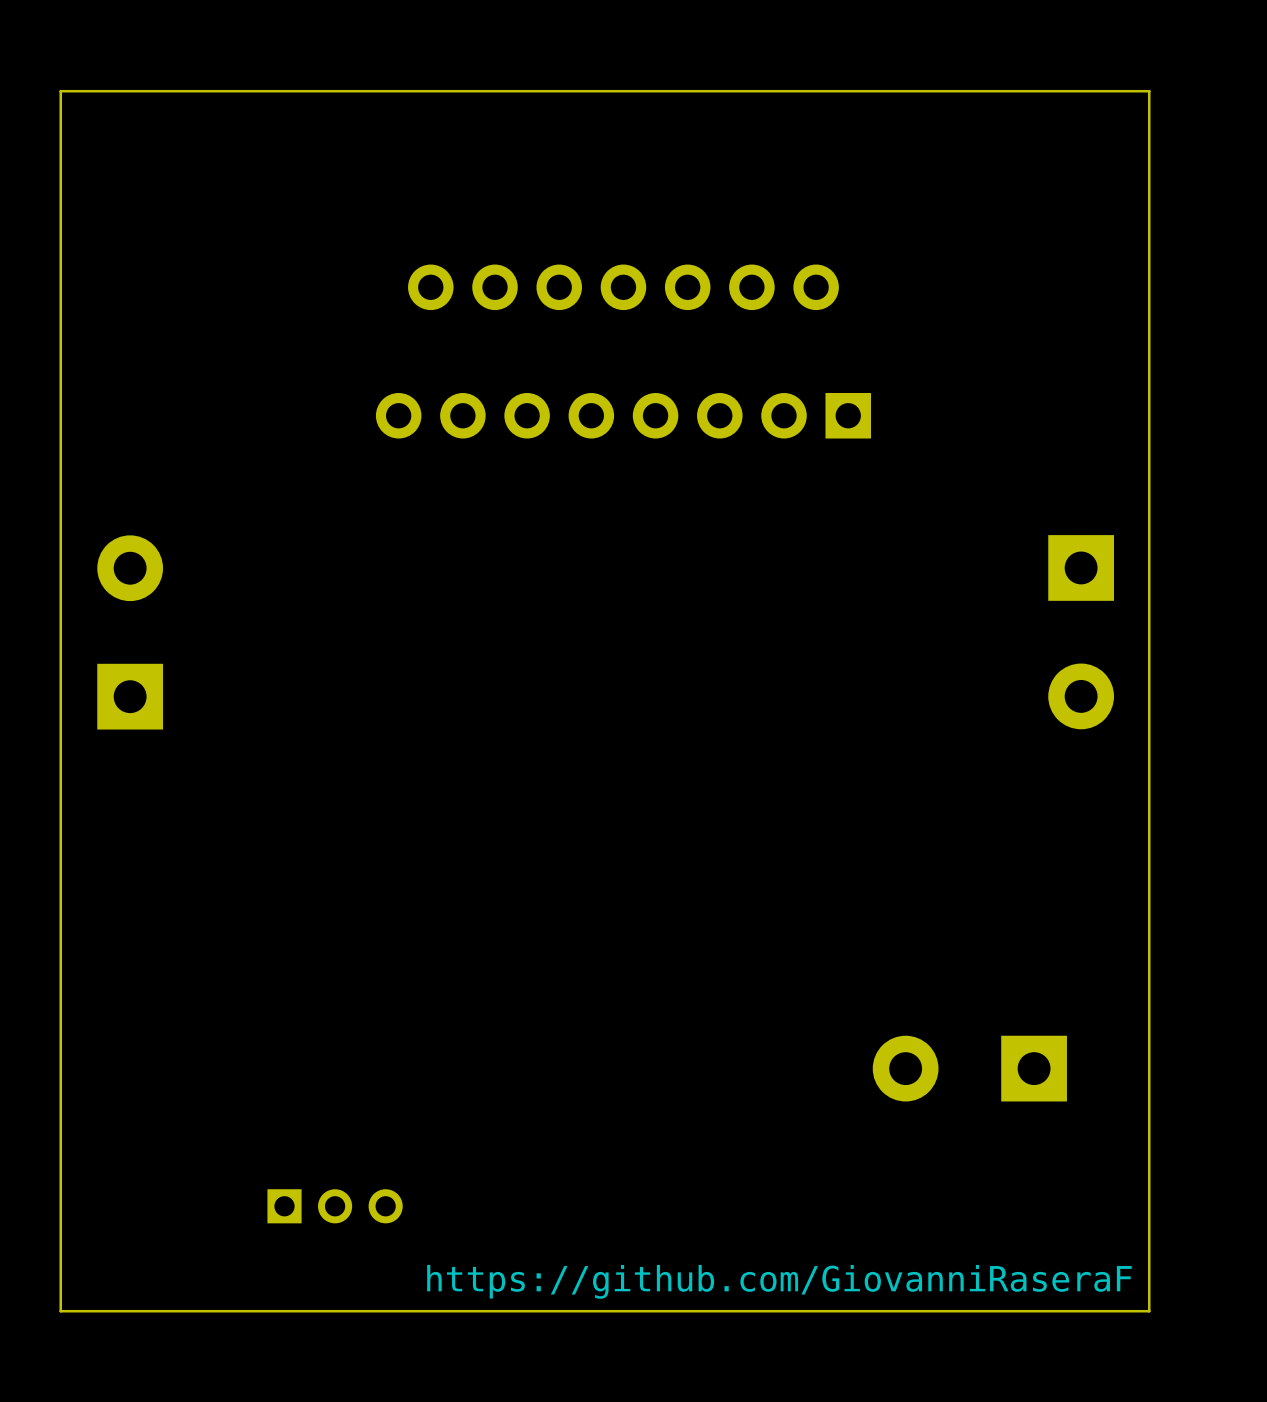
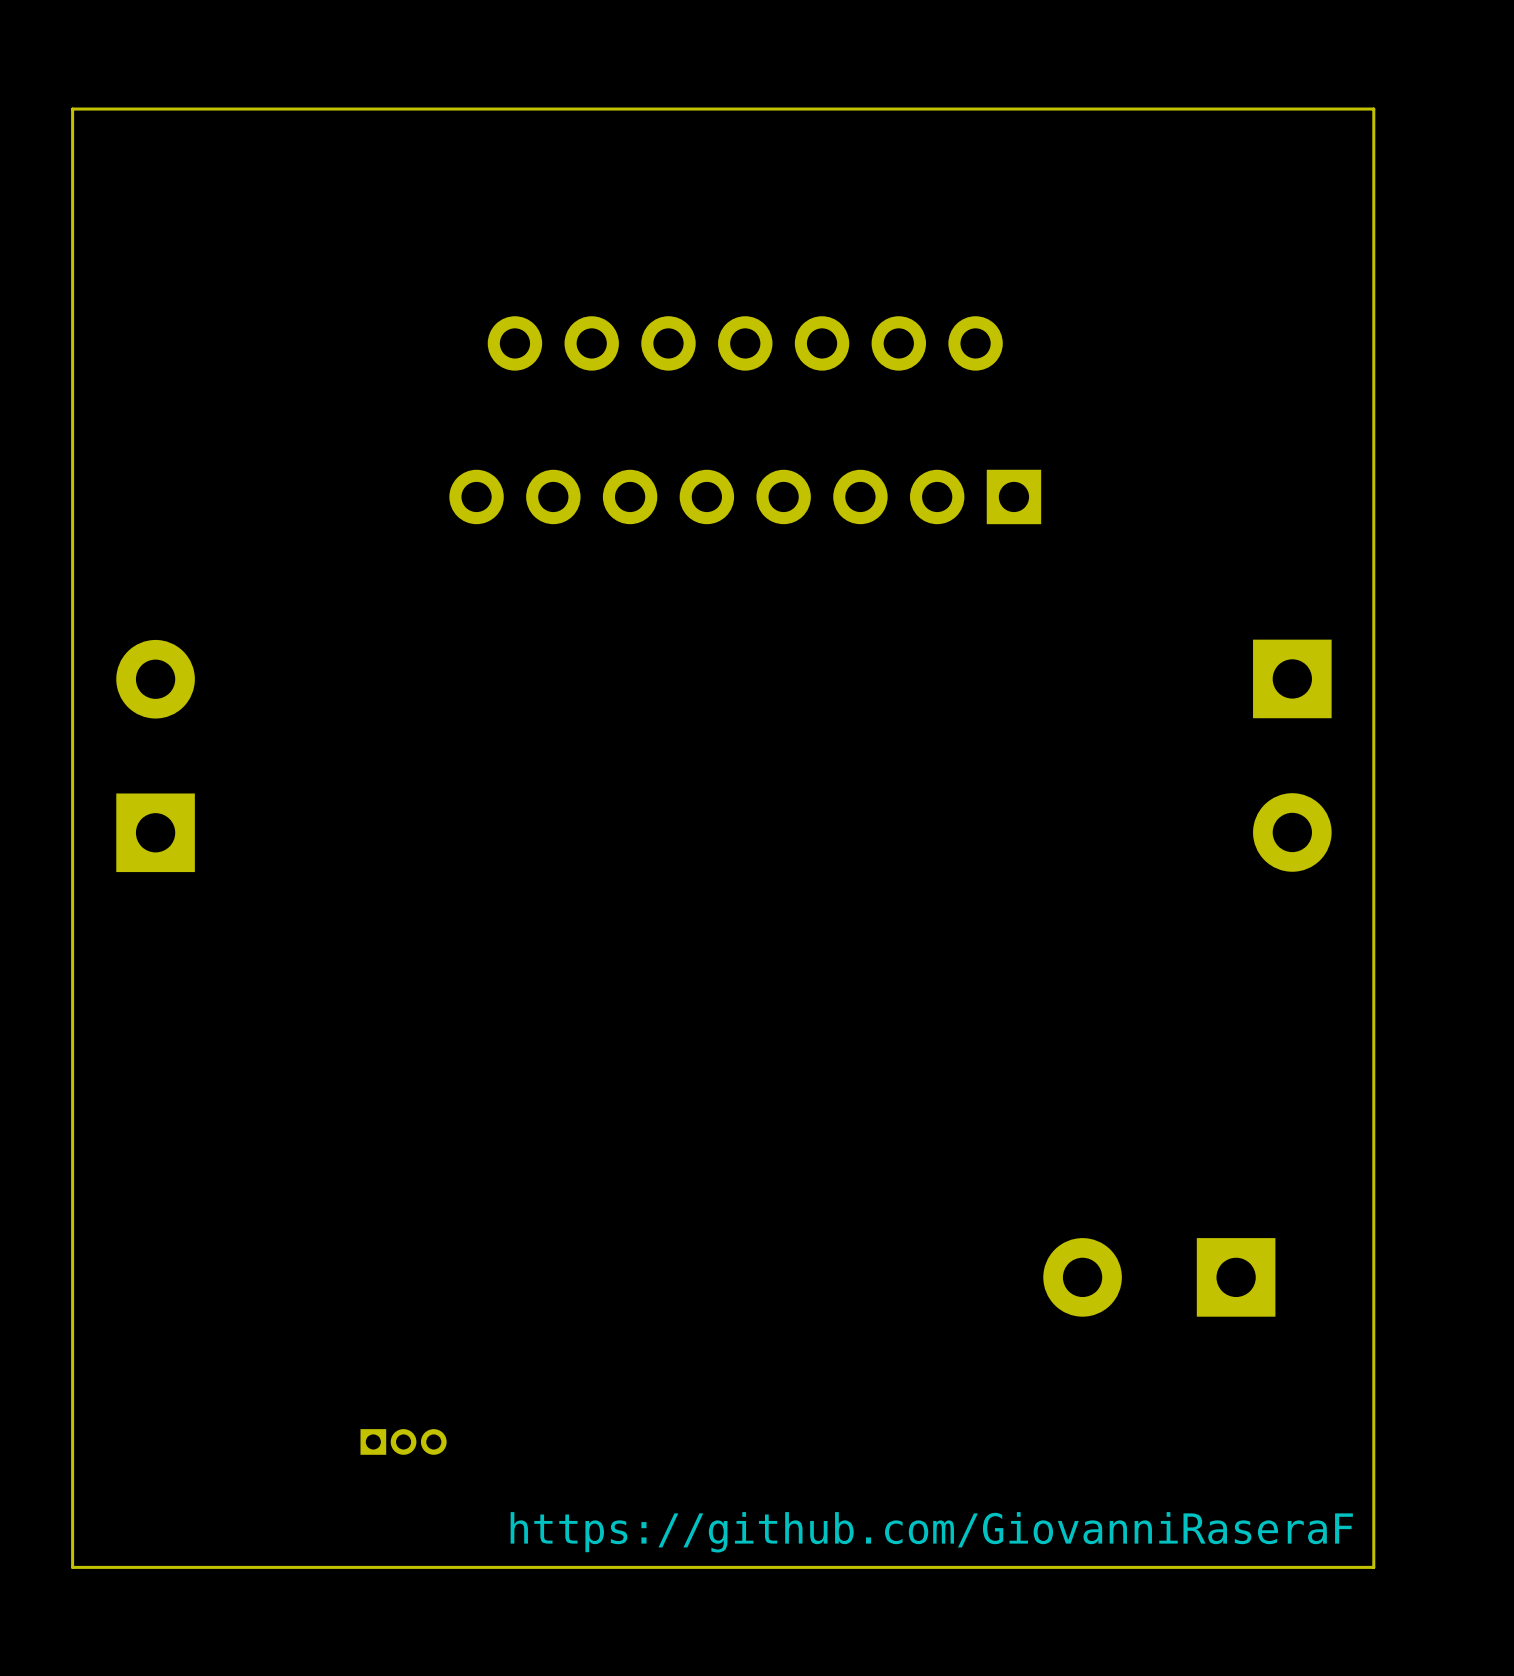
part footprint: [267, 1189, 403, 1224] -> [360, 1429, 447, 1455]

